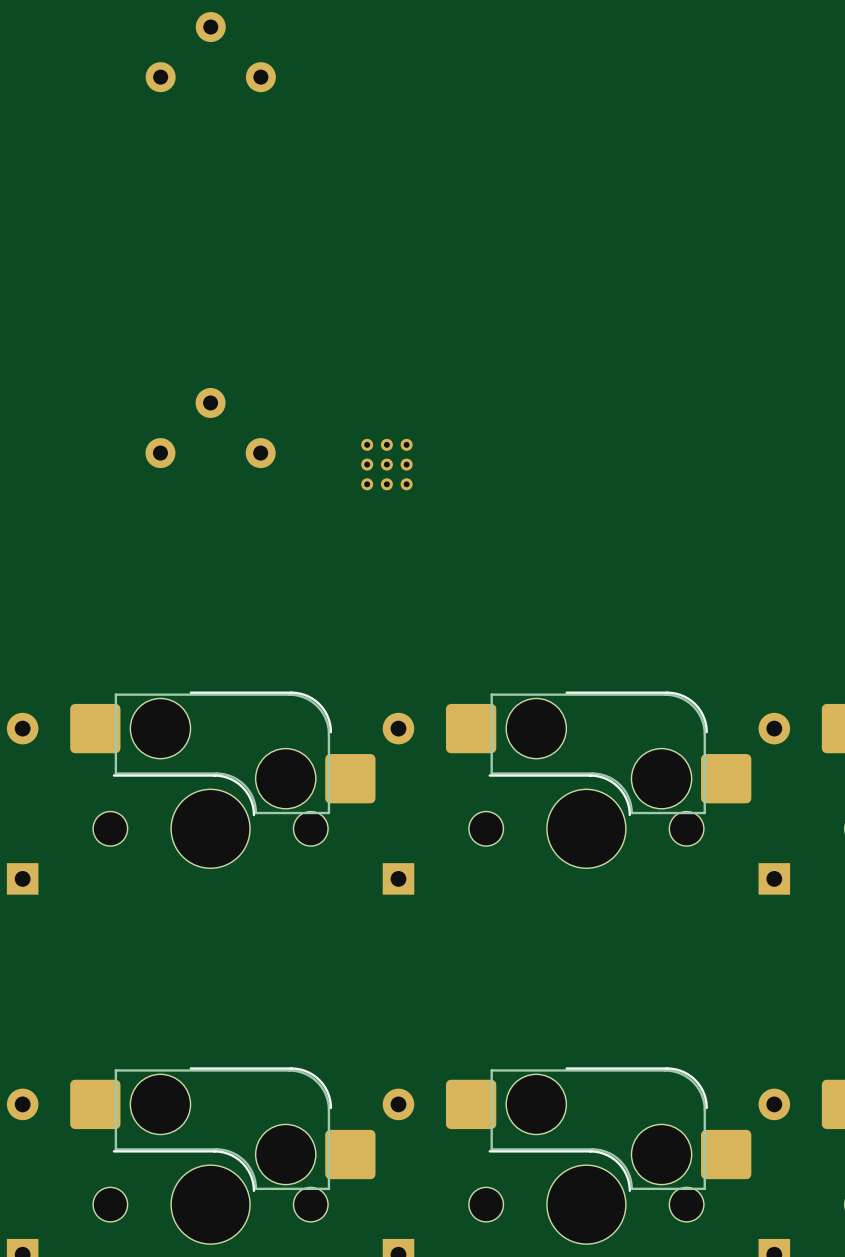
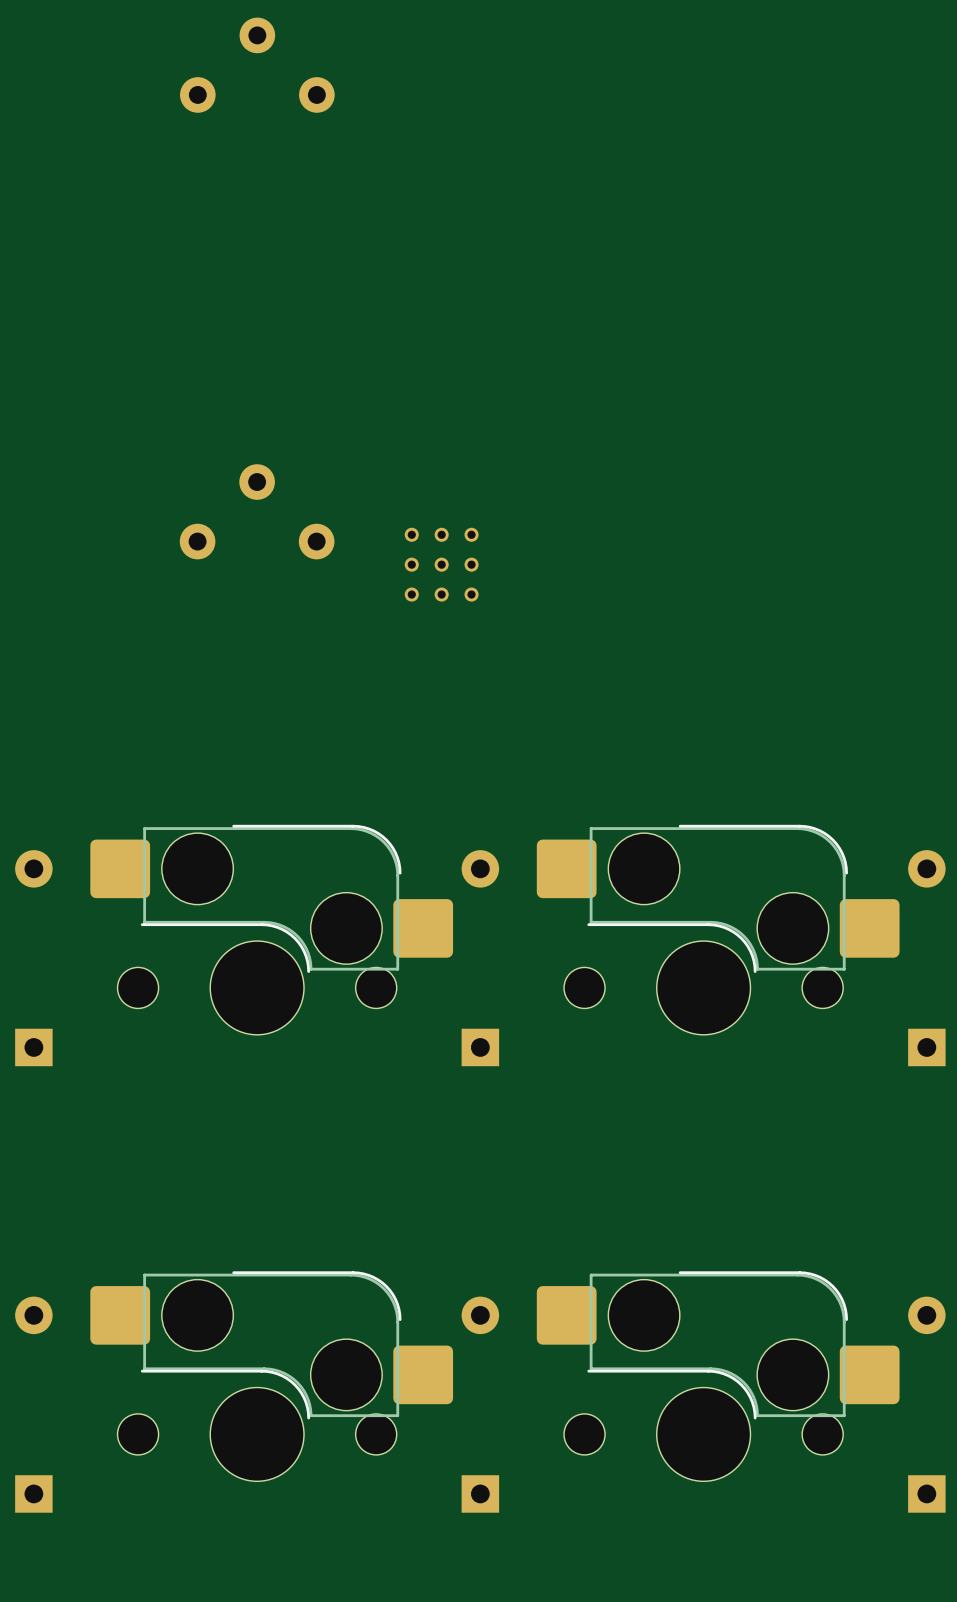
part: (386, 464) -> none
part: none -> (441, 564)

